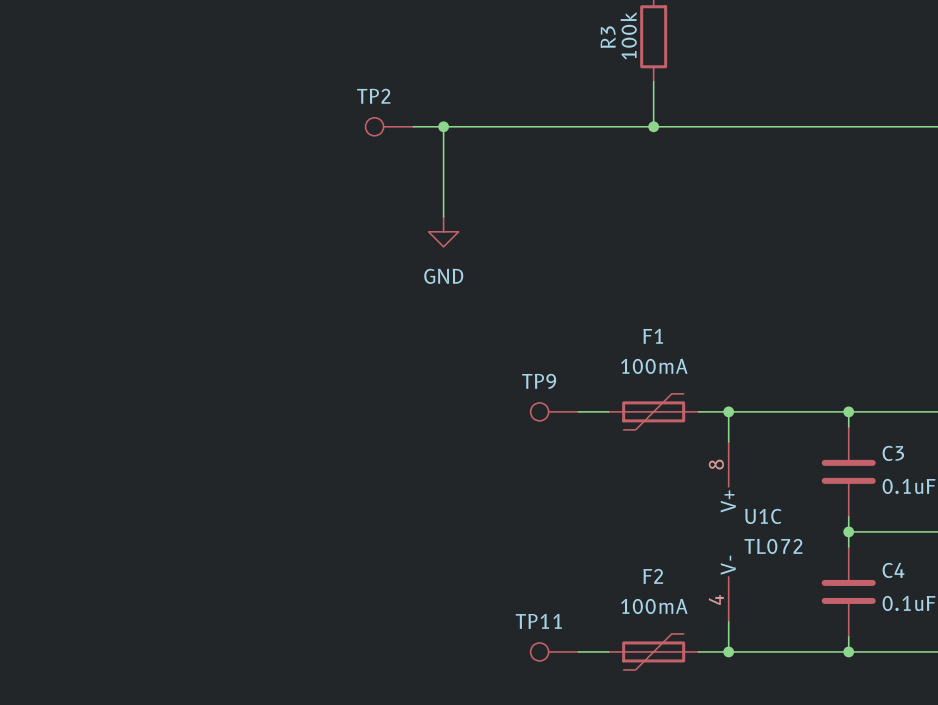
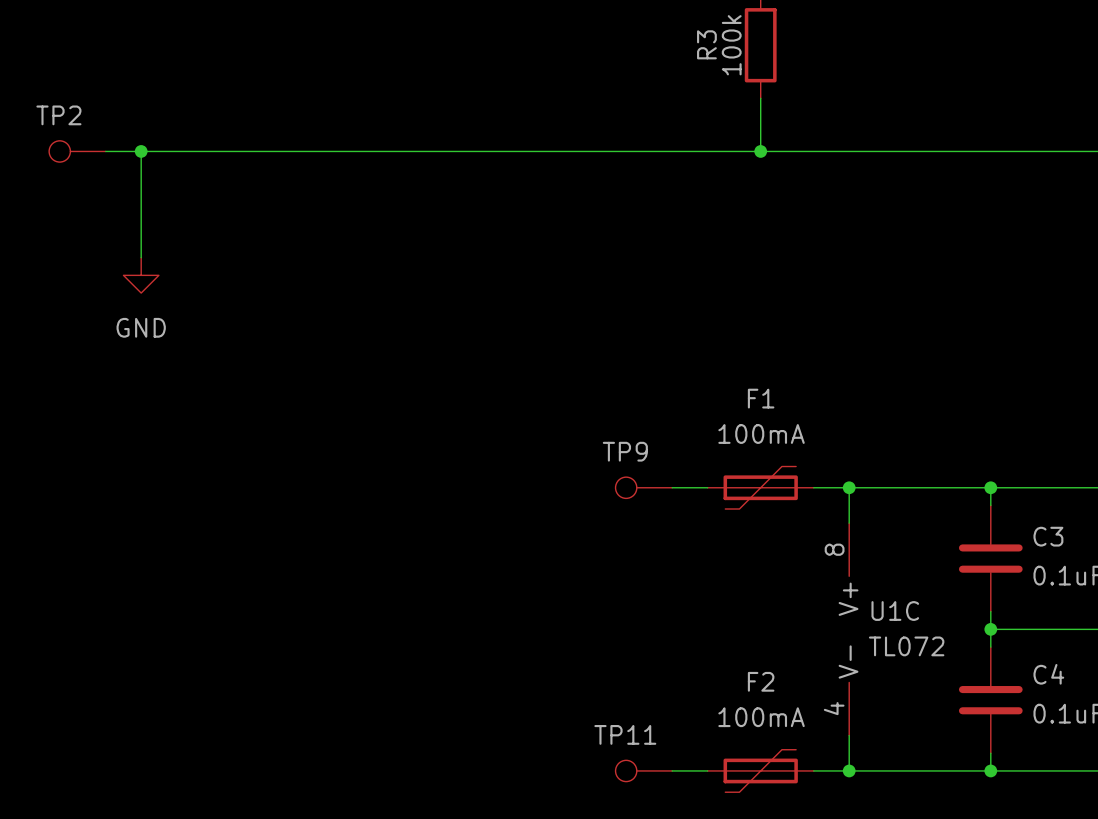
wire: none -> (105, 151) (477, 151)
wire: none -> (141, 151) (141, 257)
junction: none -> (141, 151)
TP2 position: (389, 126) -> (77, 151)
wire: (443, 126) (443, 216) -> none
junction: (443, 126) -> none
power symbol: none -> GND (141, 275)
power symbol: GND (443, 231) -> none

